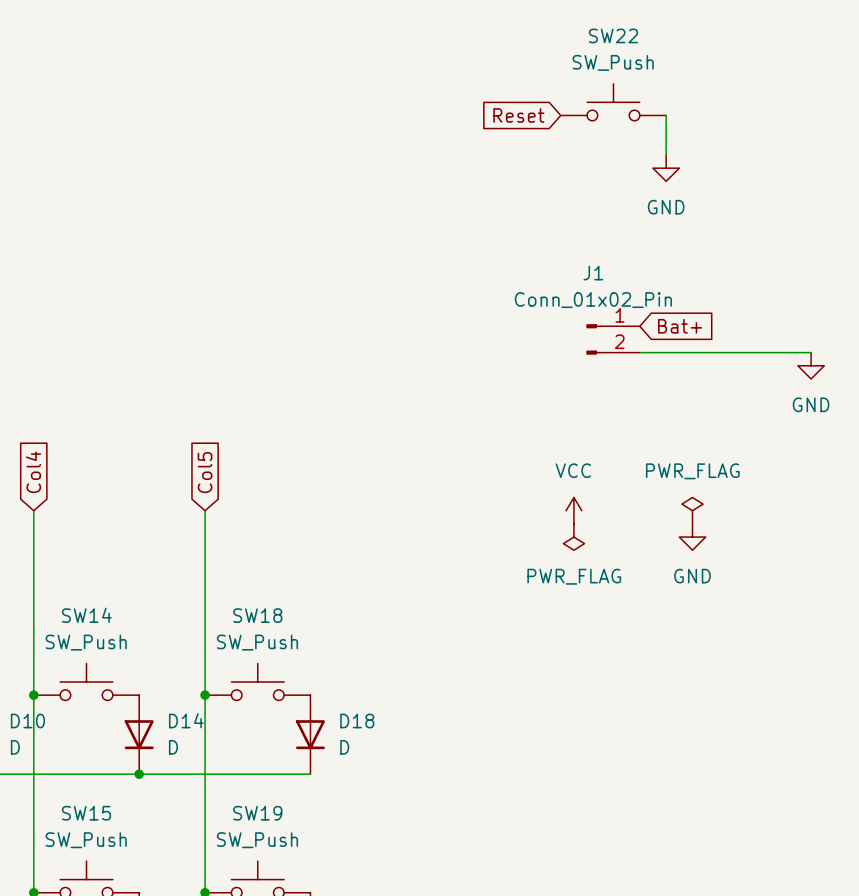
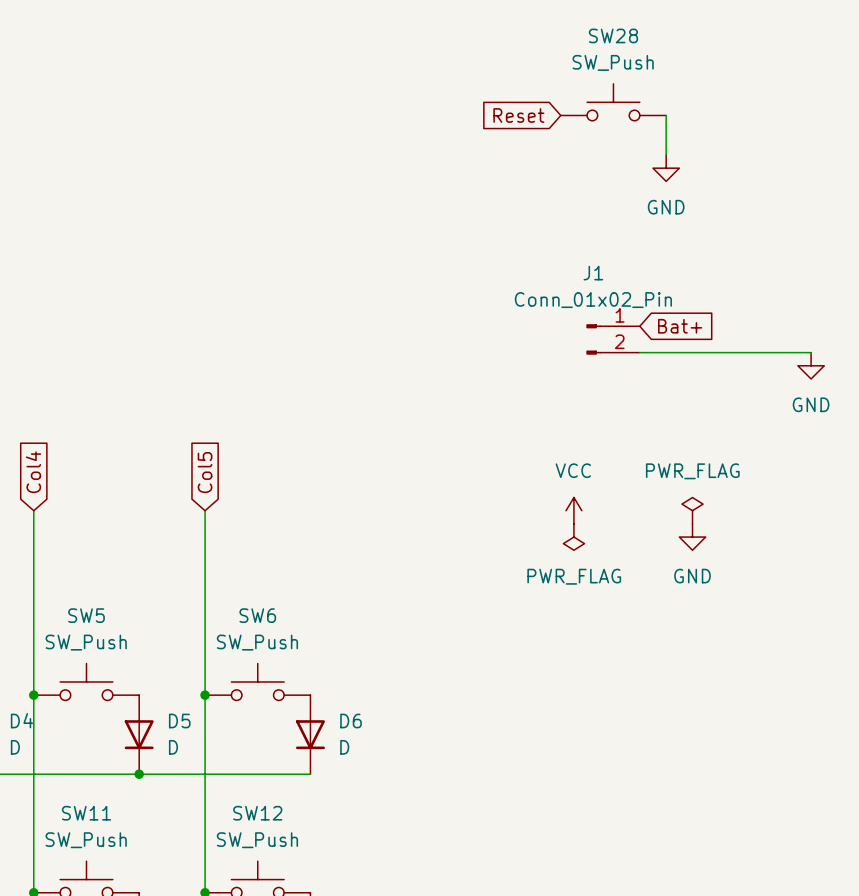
SW22 name: SW22 (613, 35) -> SW28 (613, 35)
SW14 name: SW14 (86, 615) -> SW5 (86, 615)
SW18 name: SW18 (257, 615) -> SW6 (257, 615)
D14 name: D14 (186, 720) -> D5 (179, 721)
D10 name: D10 (27, 721) -> D4 (21, 720)
D18 name: D18 (357, 721) -> D6 (351, 721)
SW15 name: SW15 (86, 813) -> SW11 (86, 813)
SW19 name: SW19 (257, 813) -> SW12 (257, 813)

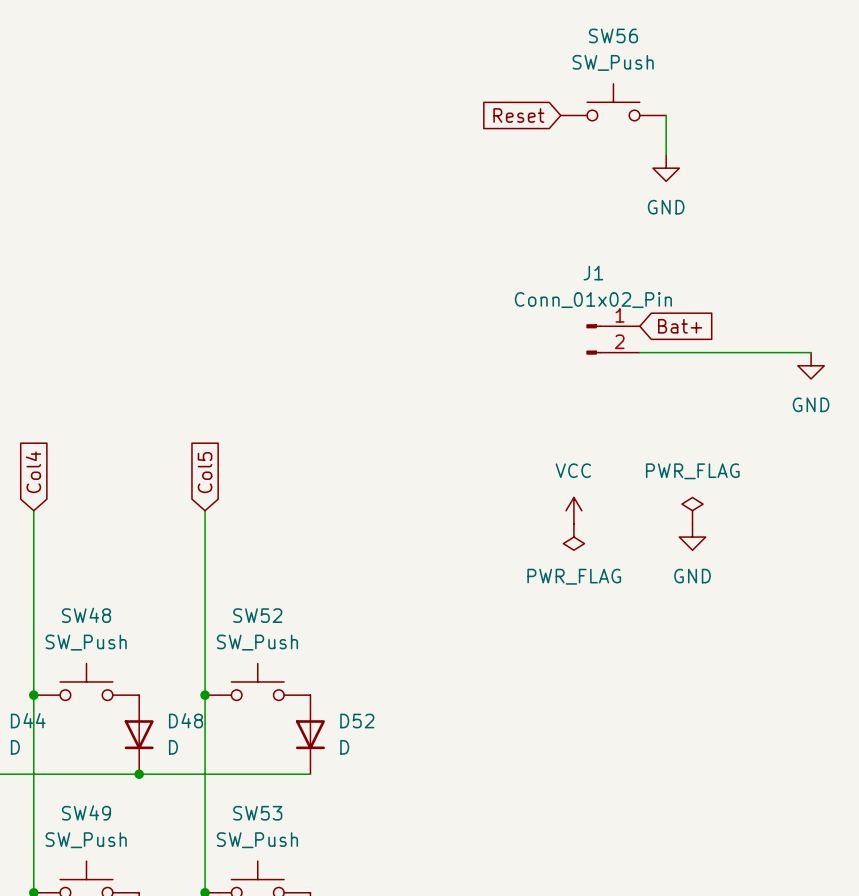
SW28 name: SW28 (613, 35) -> SW56 (613, 35)
SW5 name: SW5 (86, 615) -> SW48 (86, 615)
SW6 name: SW6 (257, 615) -> SW52 (257, 615)
D4 name: D4 (21, 720) -> D44 (28, 720)
D5 name: D5 (179, 721) -> D48 (186, 720)
D6 name: D6 (351, 721) -> D52 (357, 721)
SW11 name: SW11 (86, 813) -> SW49 (86, 812)
SW12 name: SW12 (257, 813) -> SW53 (257, 813)

